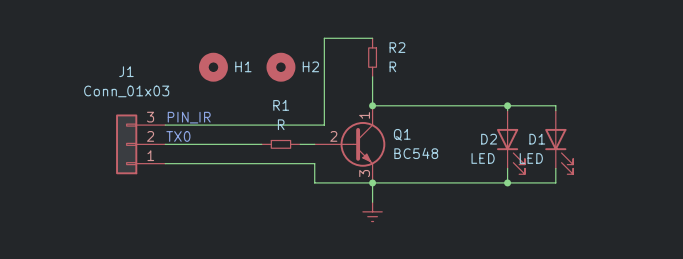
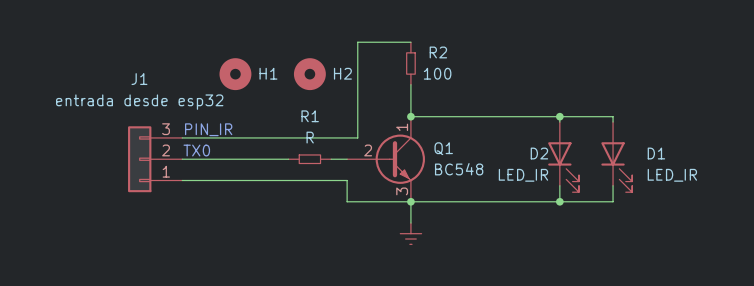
R2 value: R (392, 66) -> 100 (437, 73)
J1 value: Conn_01x03 (126, 91) -> entrada desde esp32 (139, 102)
D1 name position: D1 (537, 139) -> D1 (656, 153)
D2 value: LED (483, 158) -> LED_IR (523, 175)
D1 value: LED (531, 158) -> LED_IR (672, 175)

